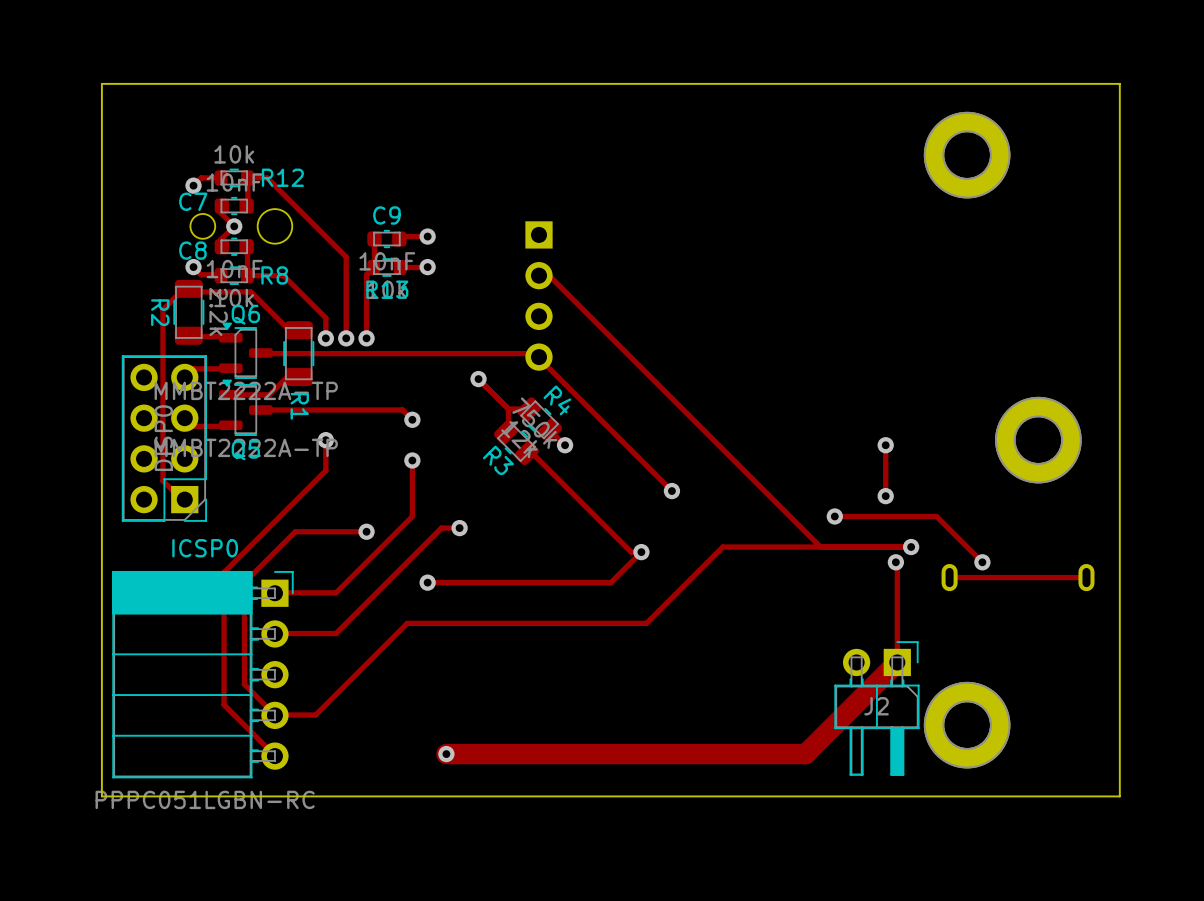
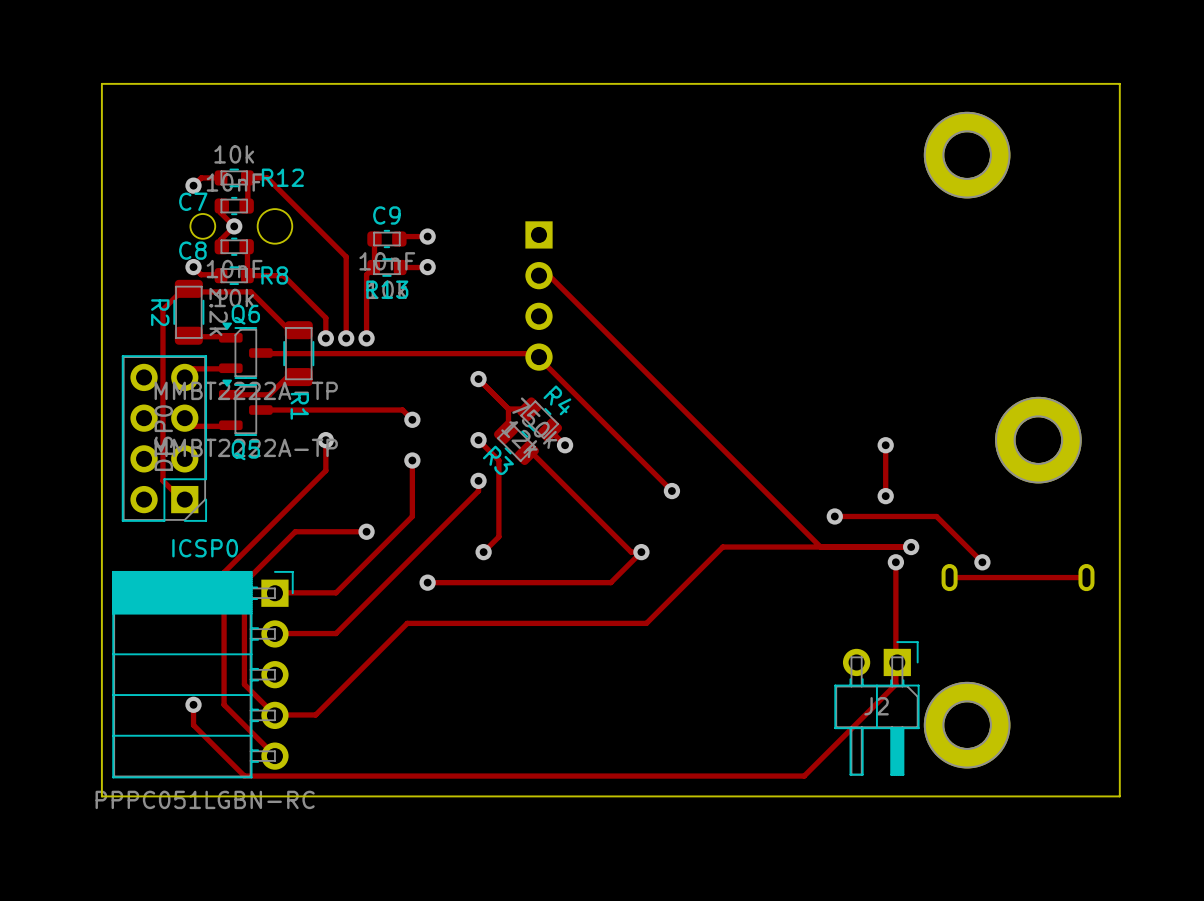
track: none -> (478, 440) (498, 460) (498, 536) (483, 552)
via: none -> (478, 440)
via: none -> (478, 480)
track: (441, 528) (459, 528) -> (441, 528) (478, 491) (478, 480)
via: (459, 528) -> none
via: none -> (483, 552)
track: (895, 562) (897, 662) (805, 754) (446, 754) -> (895, 562) (895, 684) (804, 776) (244, 776) (193, 725) (193, 704)
via: none -> (193, 704)
via: (446, 754) -> none

